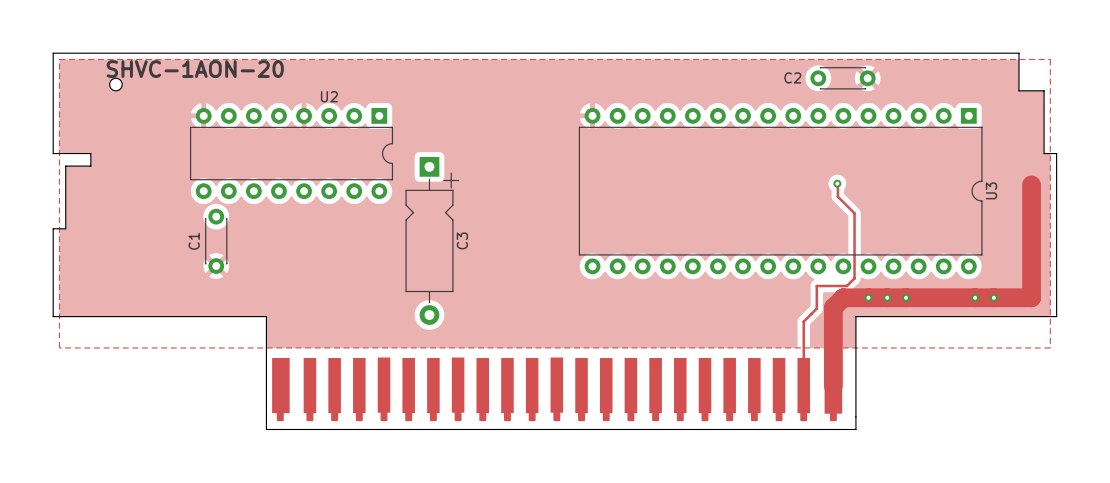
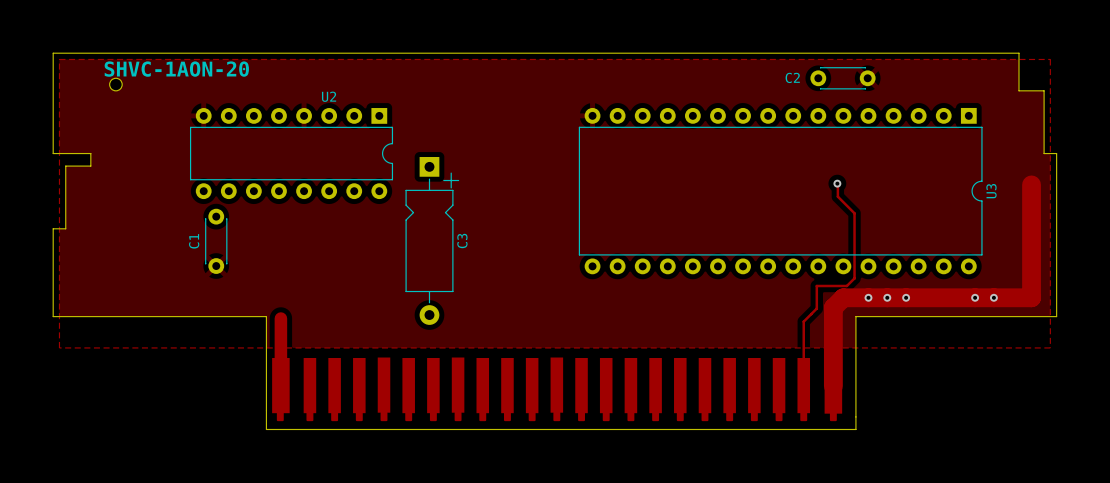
track: none -> (280, 318) (280, 385)

